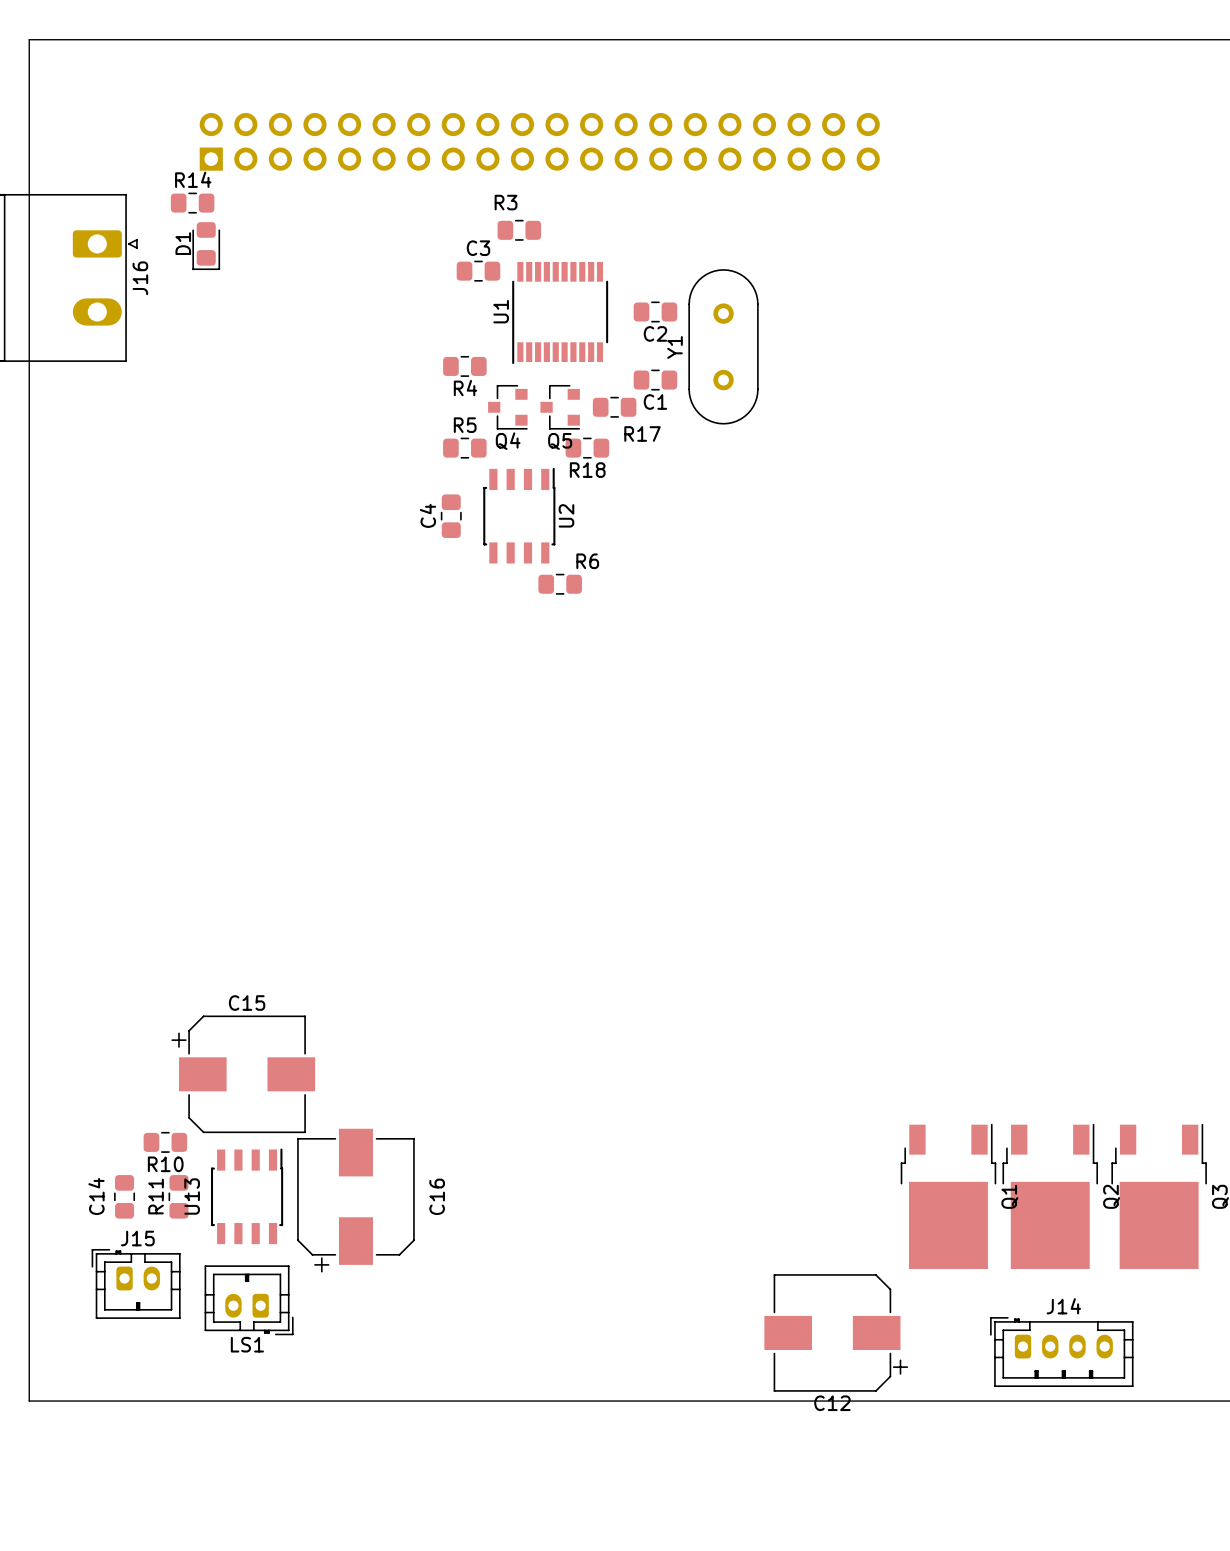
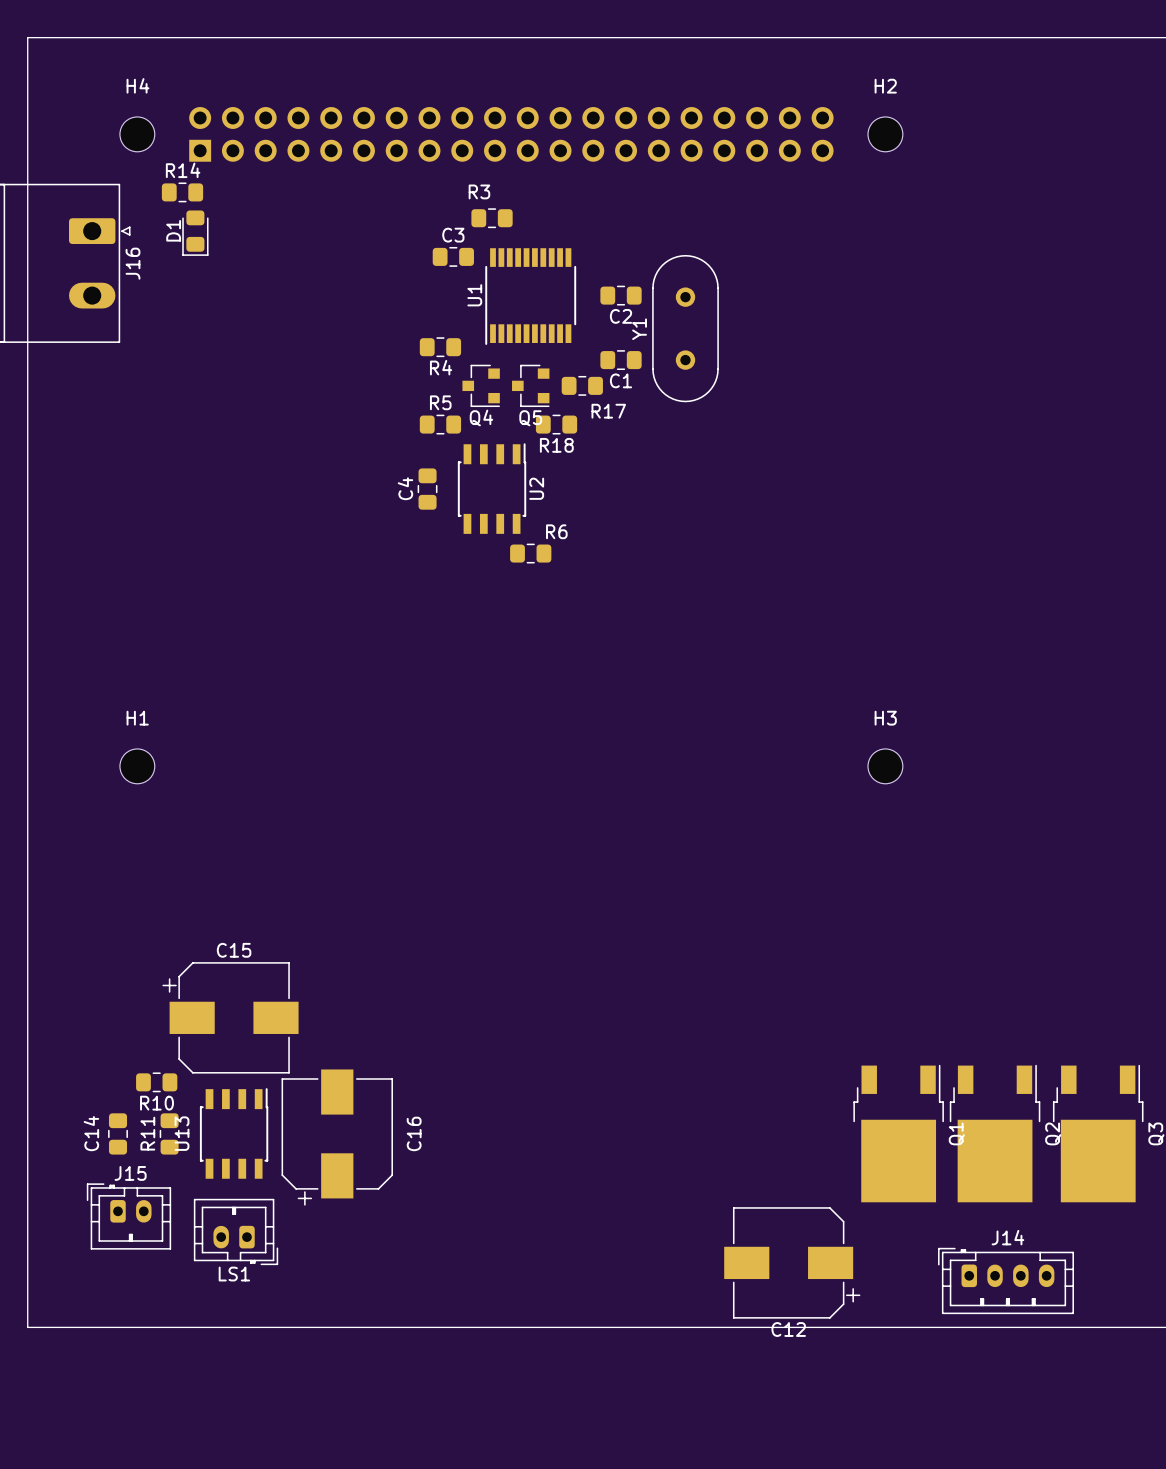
H4: none -> (137, 134)
H2: none -> (885, 134)
H1: none -> (137, 766)
H3: none -> (885, 766)

